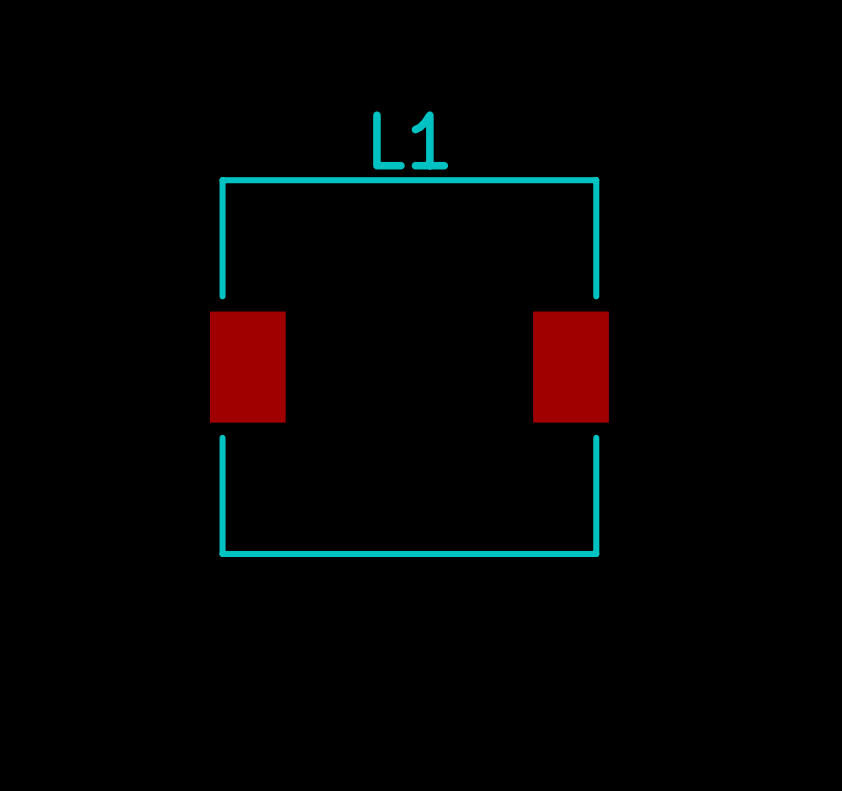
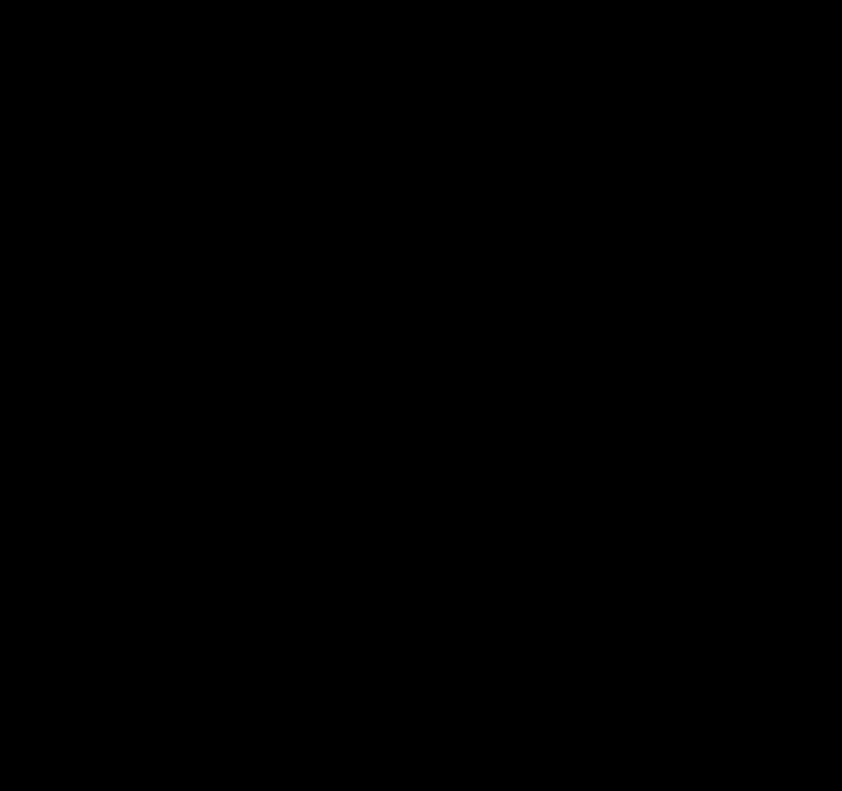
L1: (409, 367) -> none

